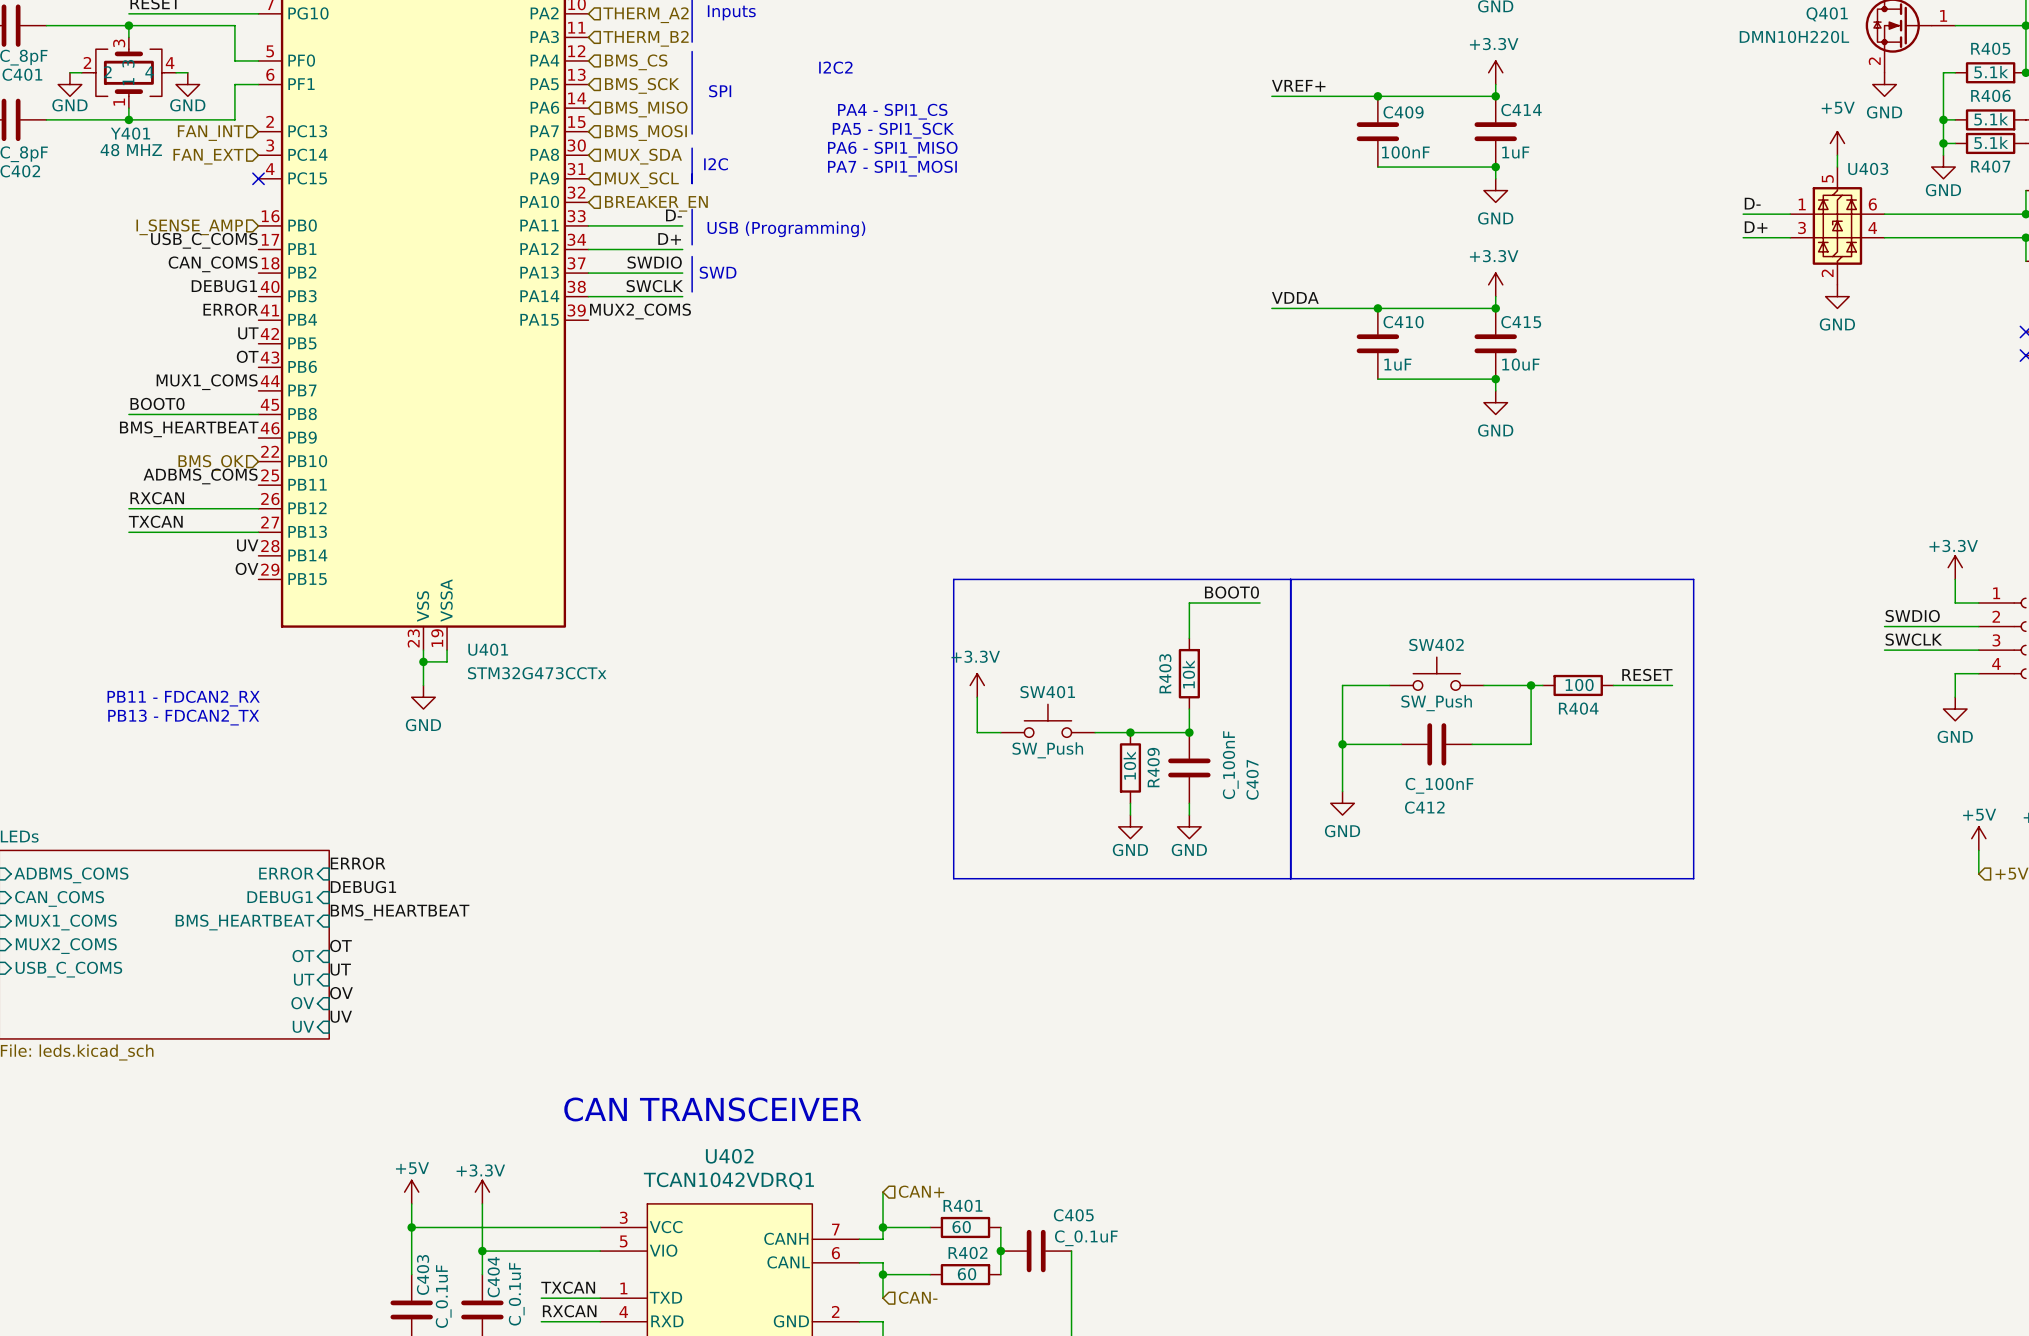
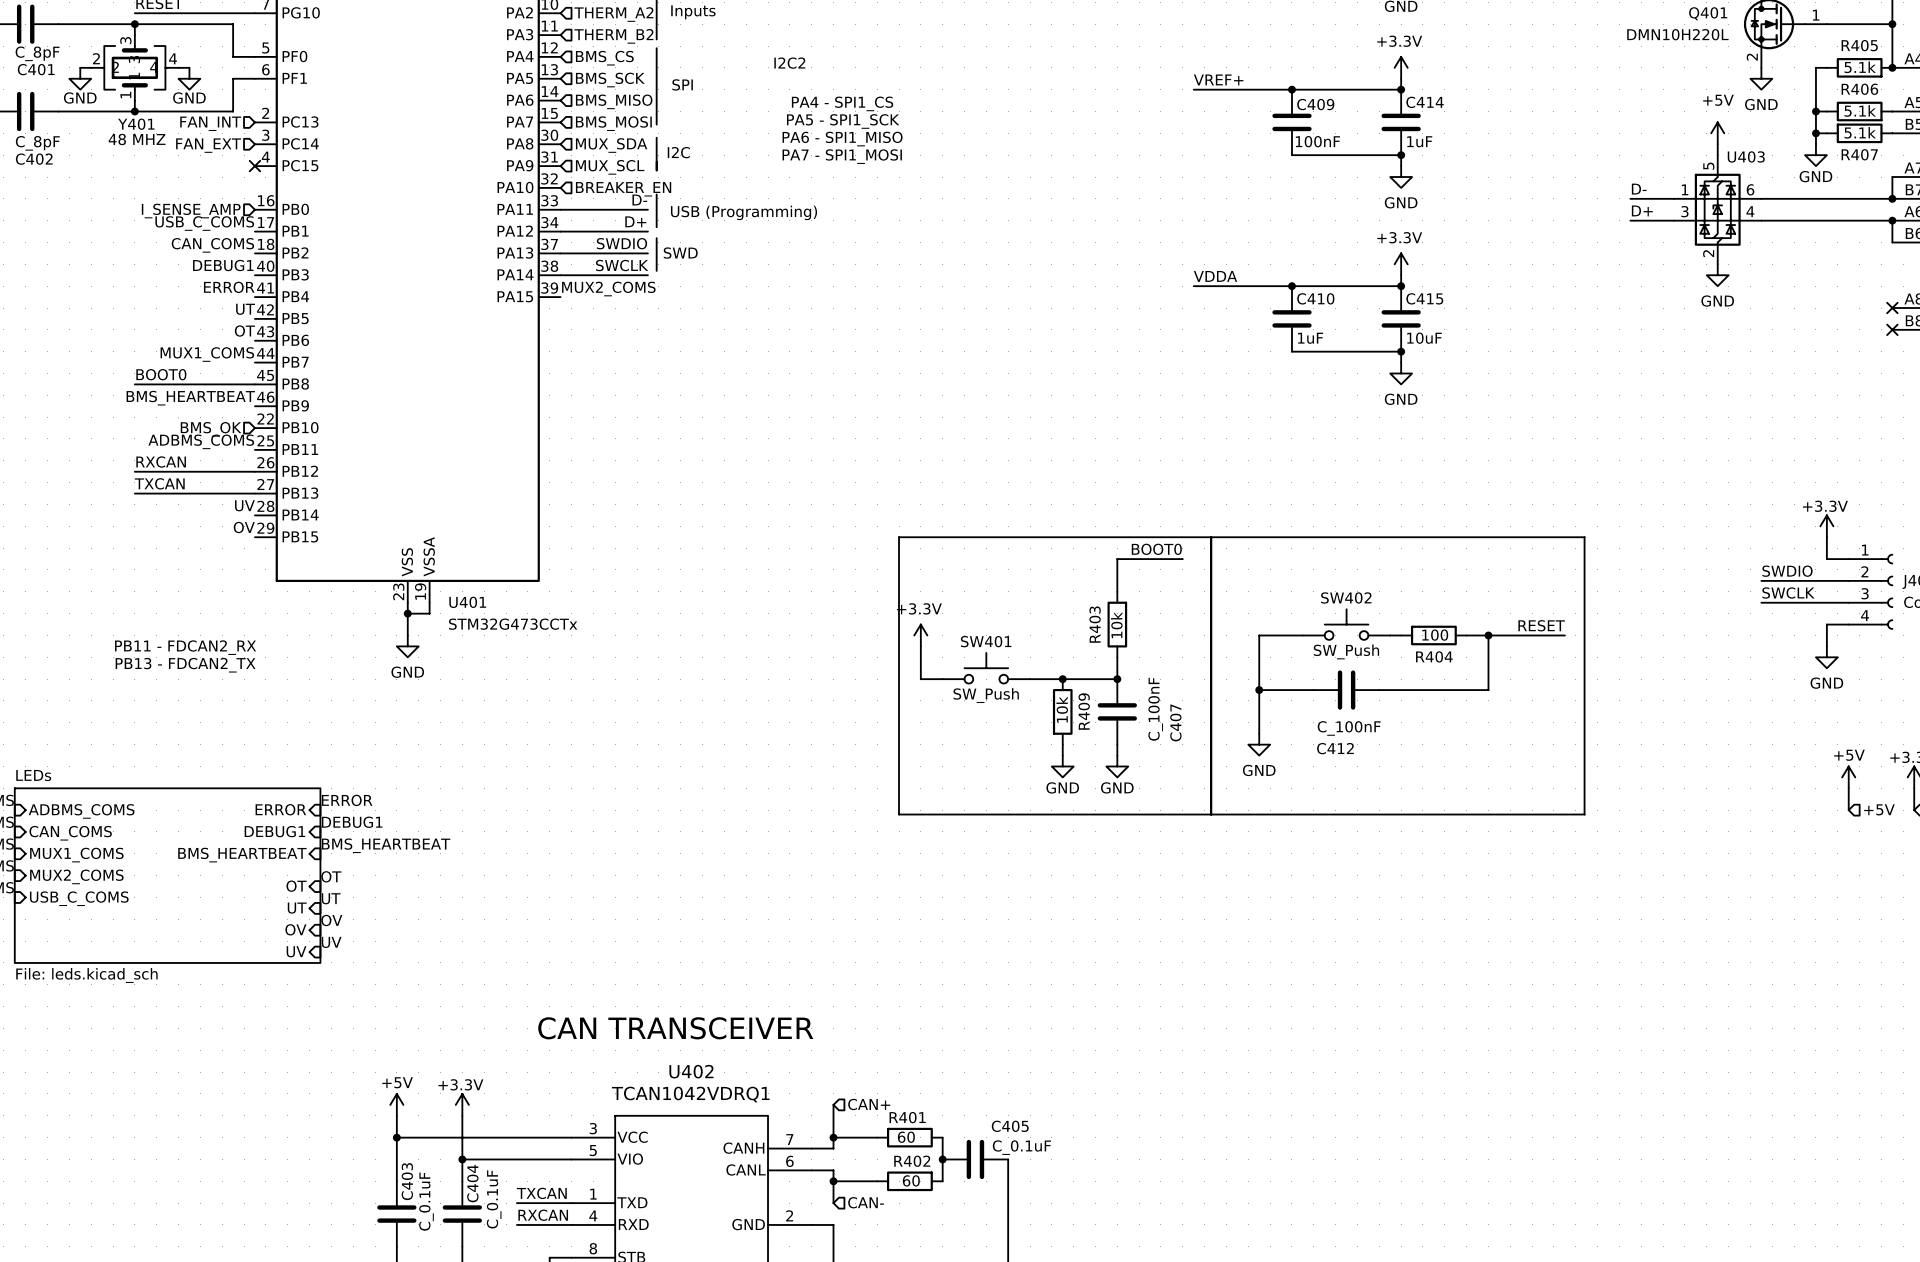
wire: (1495, 685) (1542, 685) -> (1466, 635) (1510, 635)
wire: (1531, 685) (1531, 744) -> (1488, 635) (1488, 690) (1433, 690)
junction: (1531, 685) -> none
R404 position: (1578, 685) -> (1433, 635)
junction: none -> (1488, 635)

